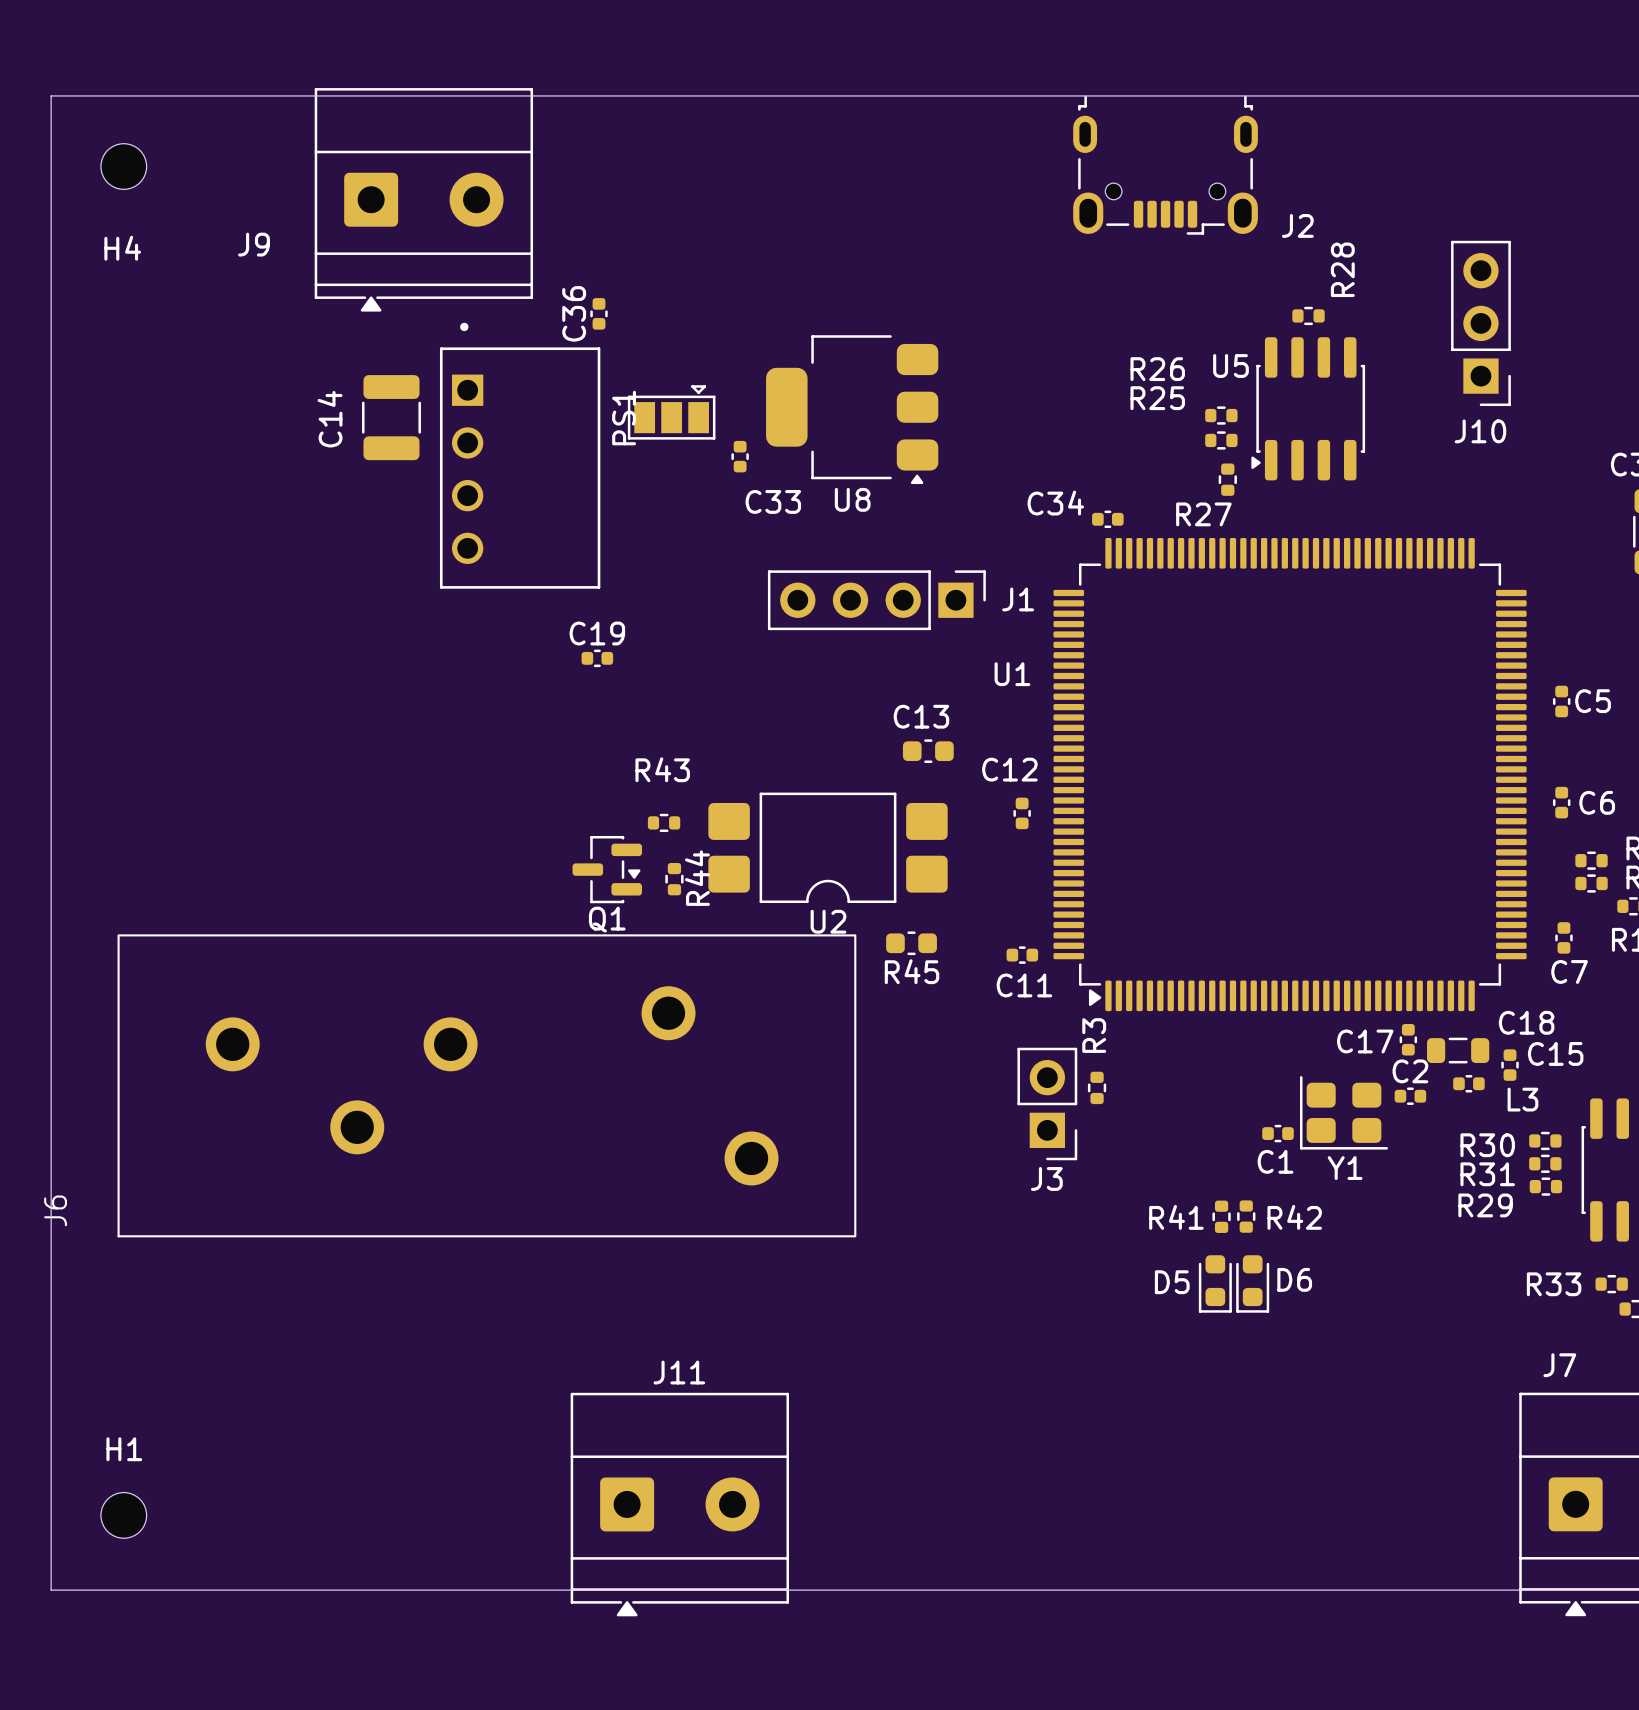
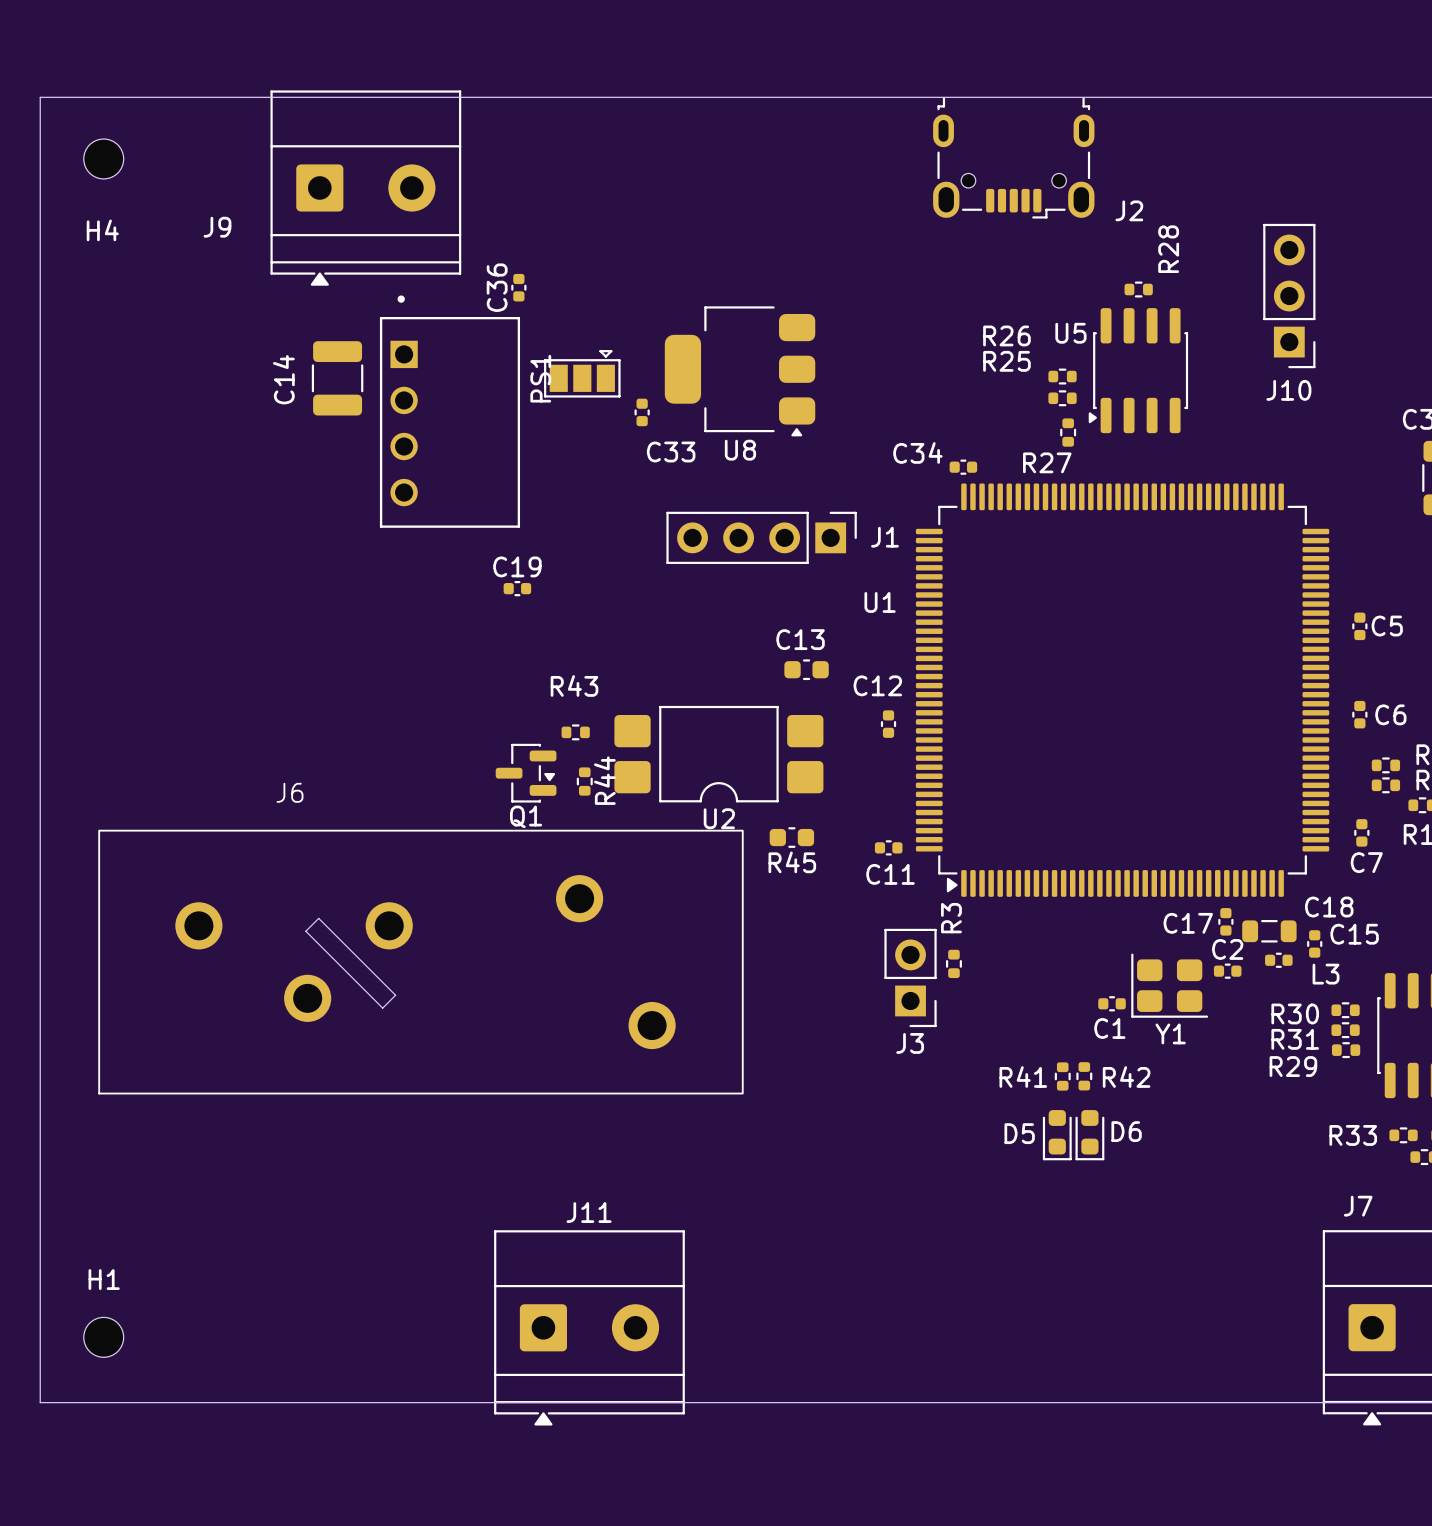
board edge: none -> (318, 918) (305, 931) (382, 1008) (395, 995) (318, 918)
J6 name rotation: 0° (55, 1210) -> 90° clockwise (290, 792)
J6 name position: J6 (55, 1210) -> J6 (290, 792)

